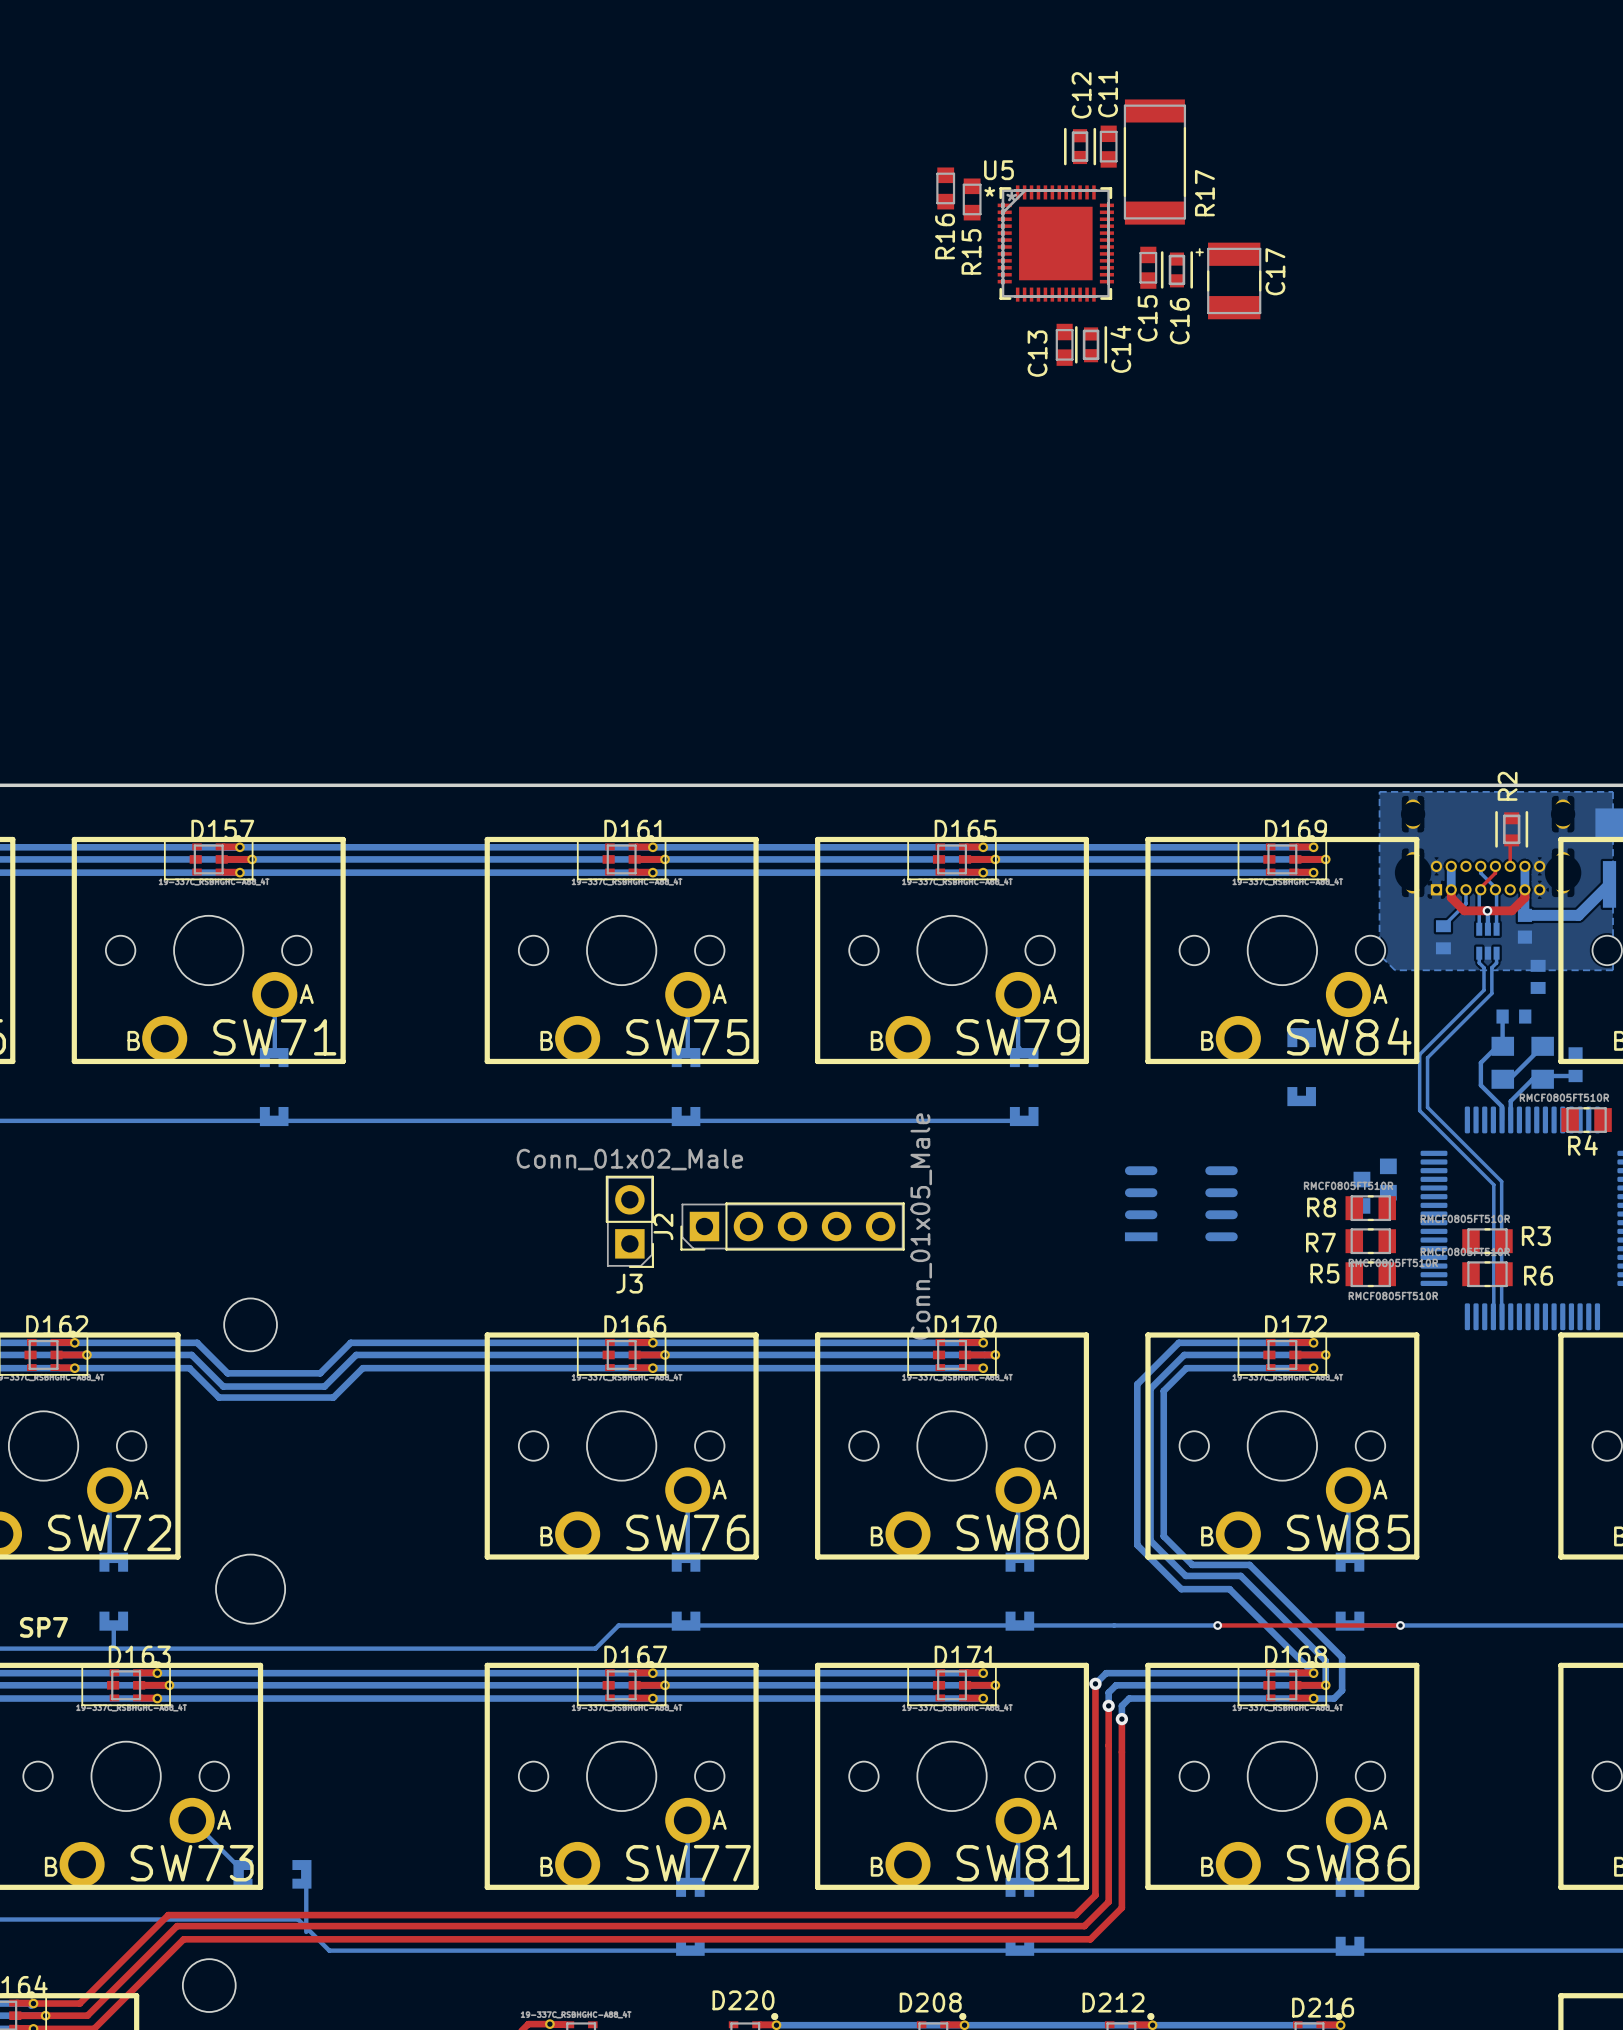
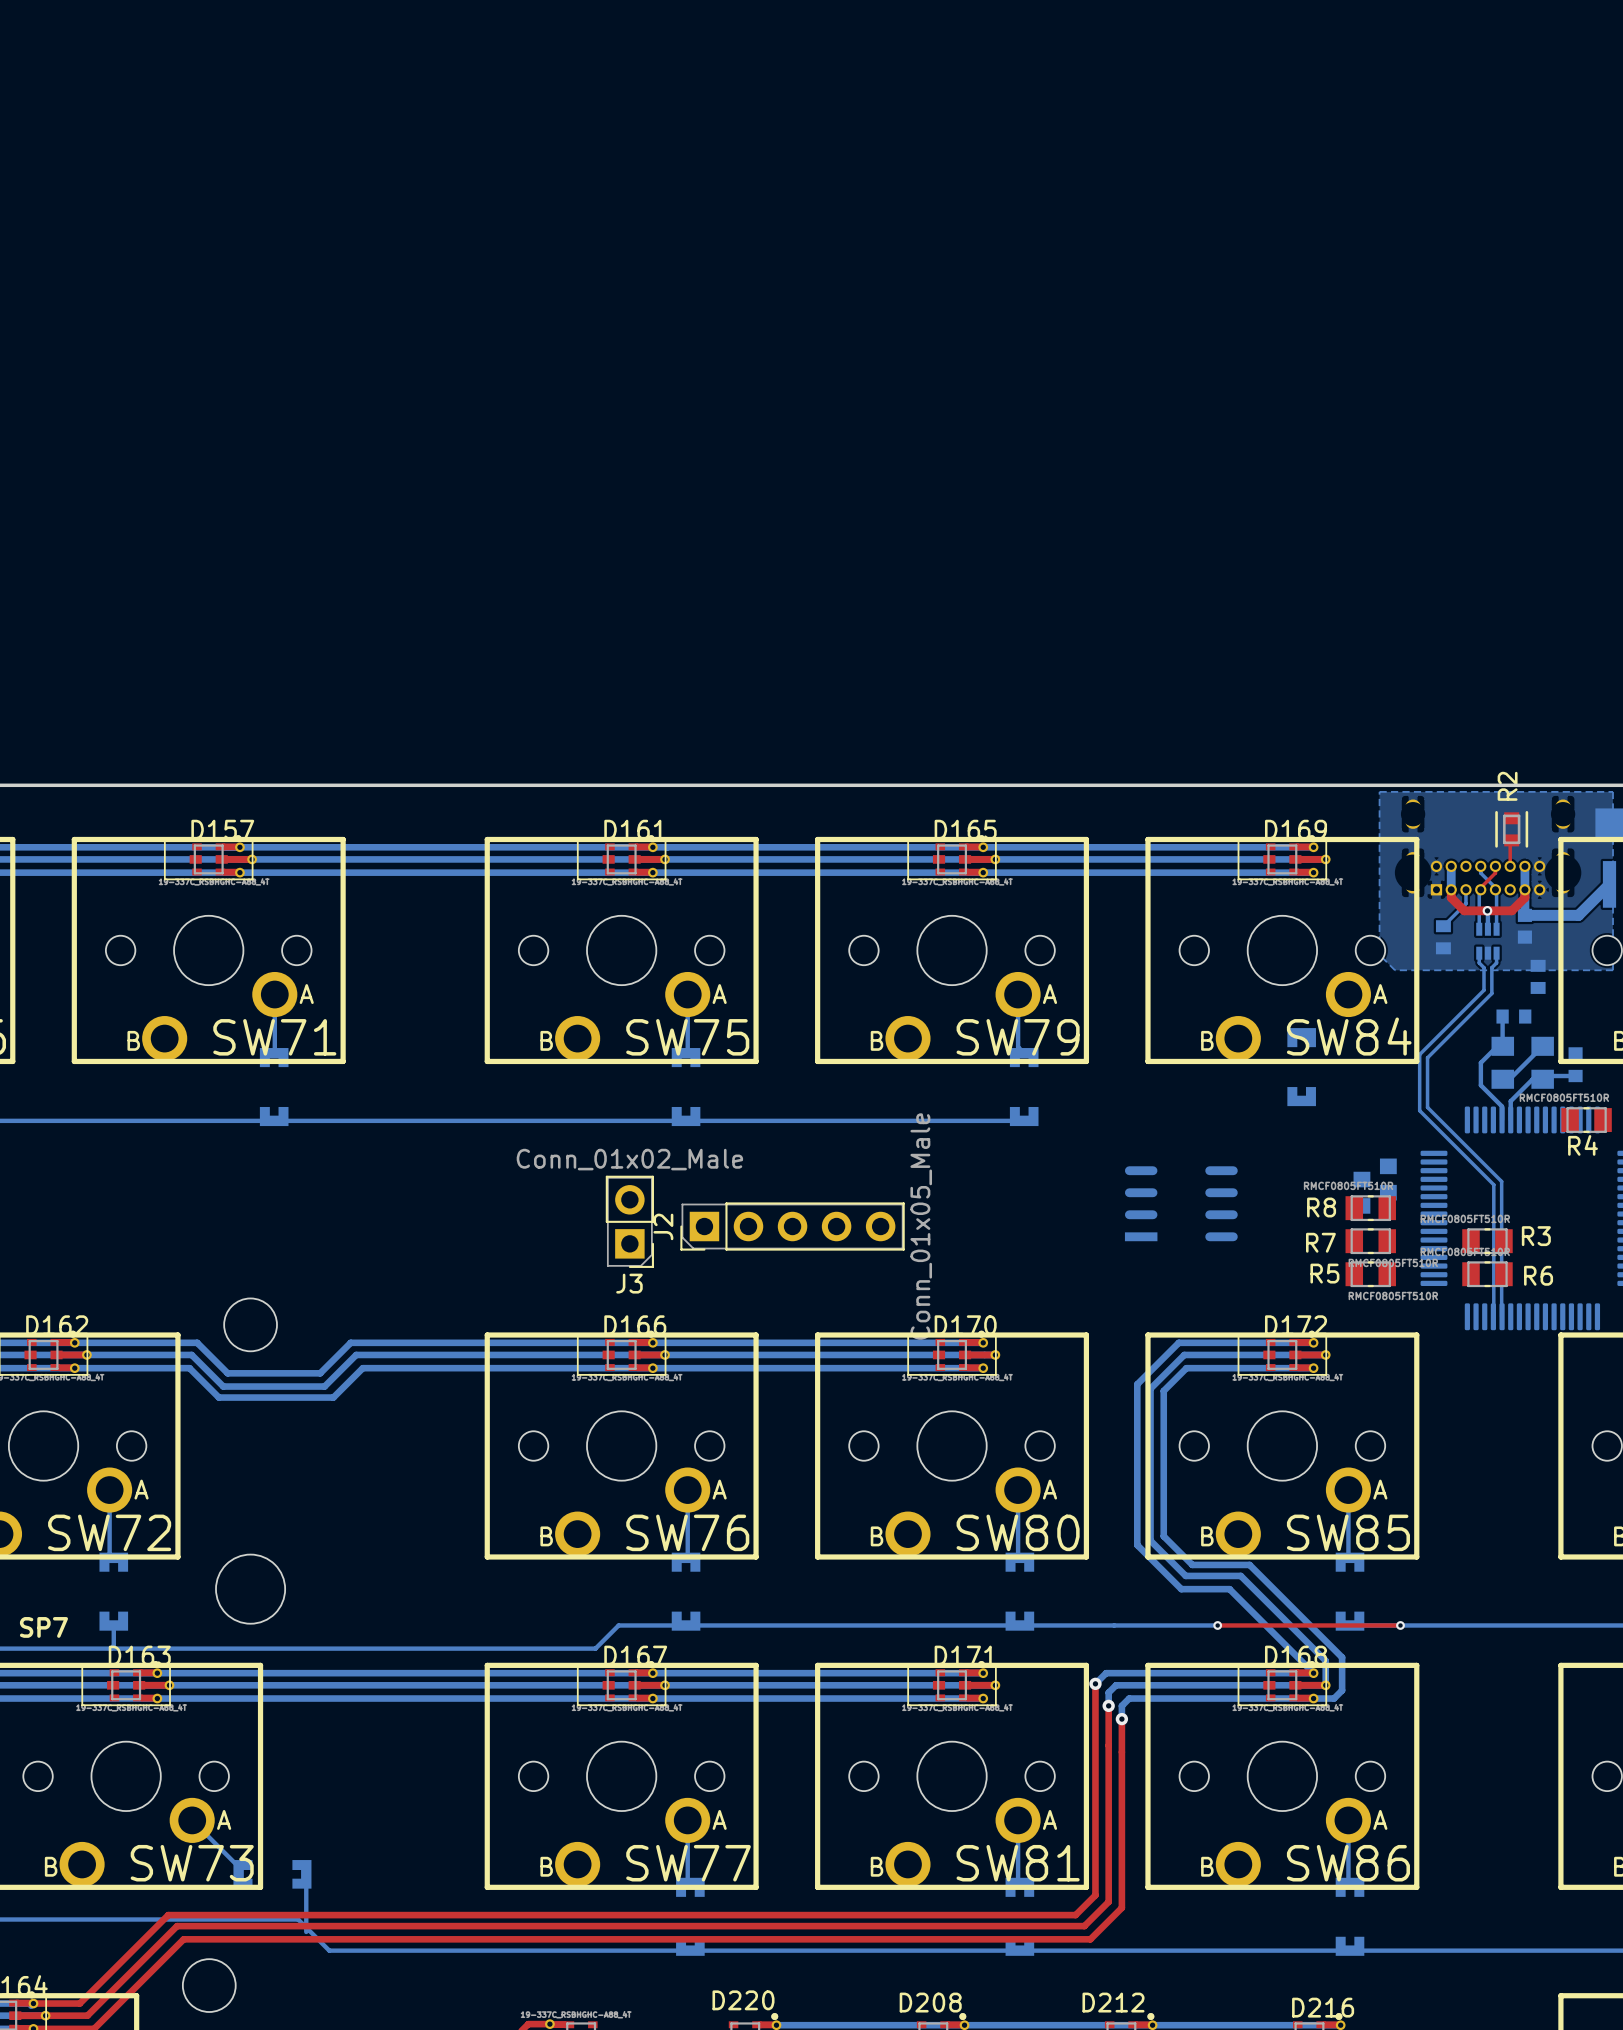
C12: (1080, 146) -> none
C11: (1108, 146) -> none
R17: (1154, 162) -> none
R16: (945, 188) -> none
R15: (972, 199) -> none
U5: (1055, 243) -> none
C15: (1148, 267) -> none
C16: (1176, 269) -> none
C17: (1234, 280) -> none
C13: (1064, 344) -> none
C14: (1091, 344) -> none

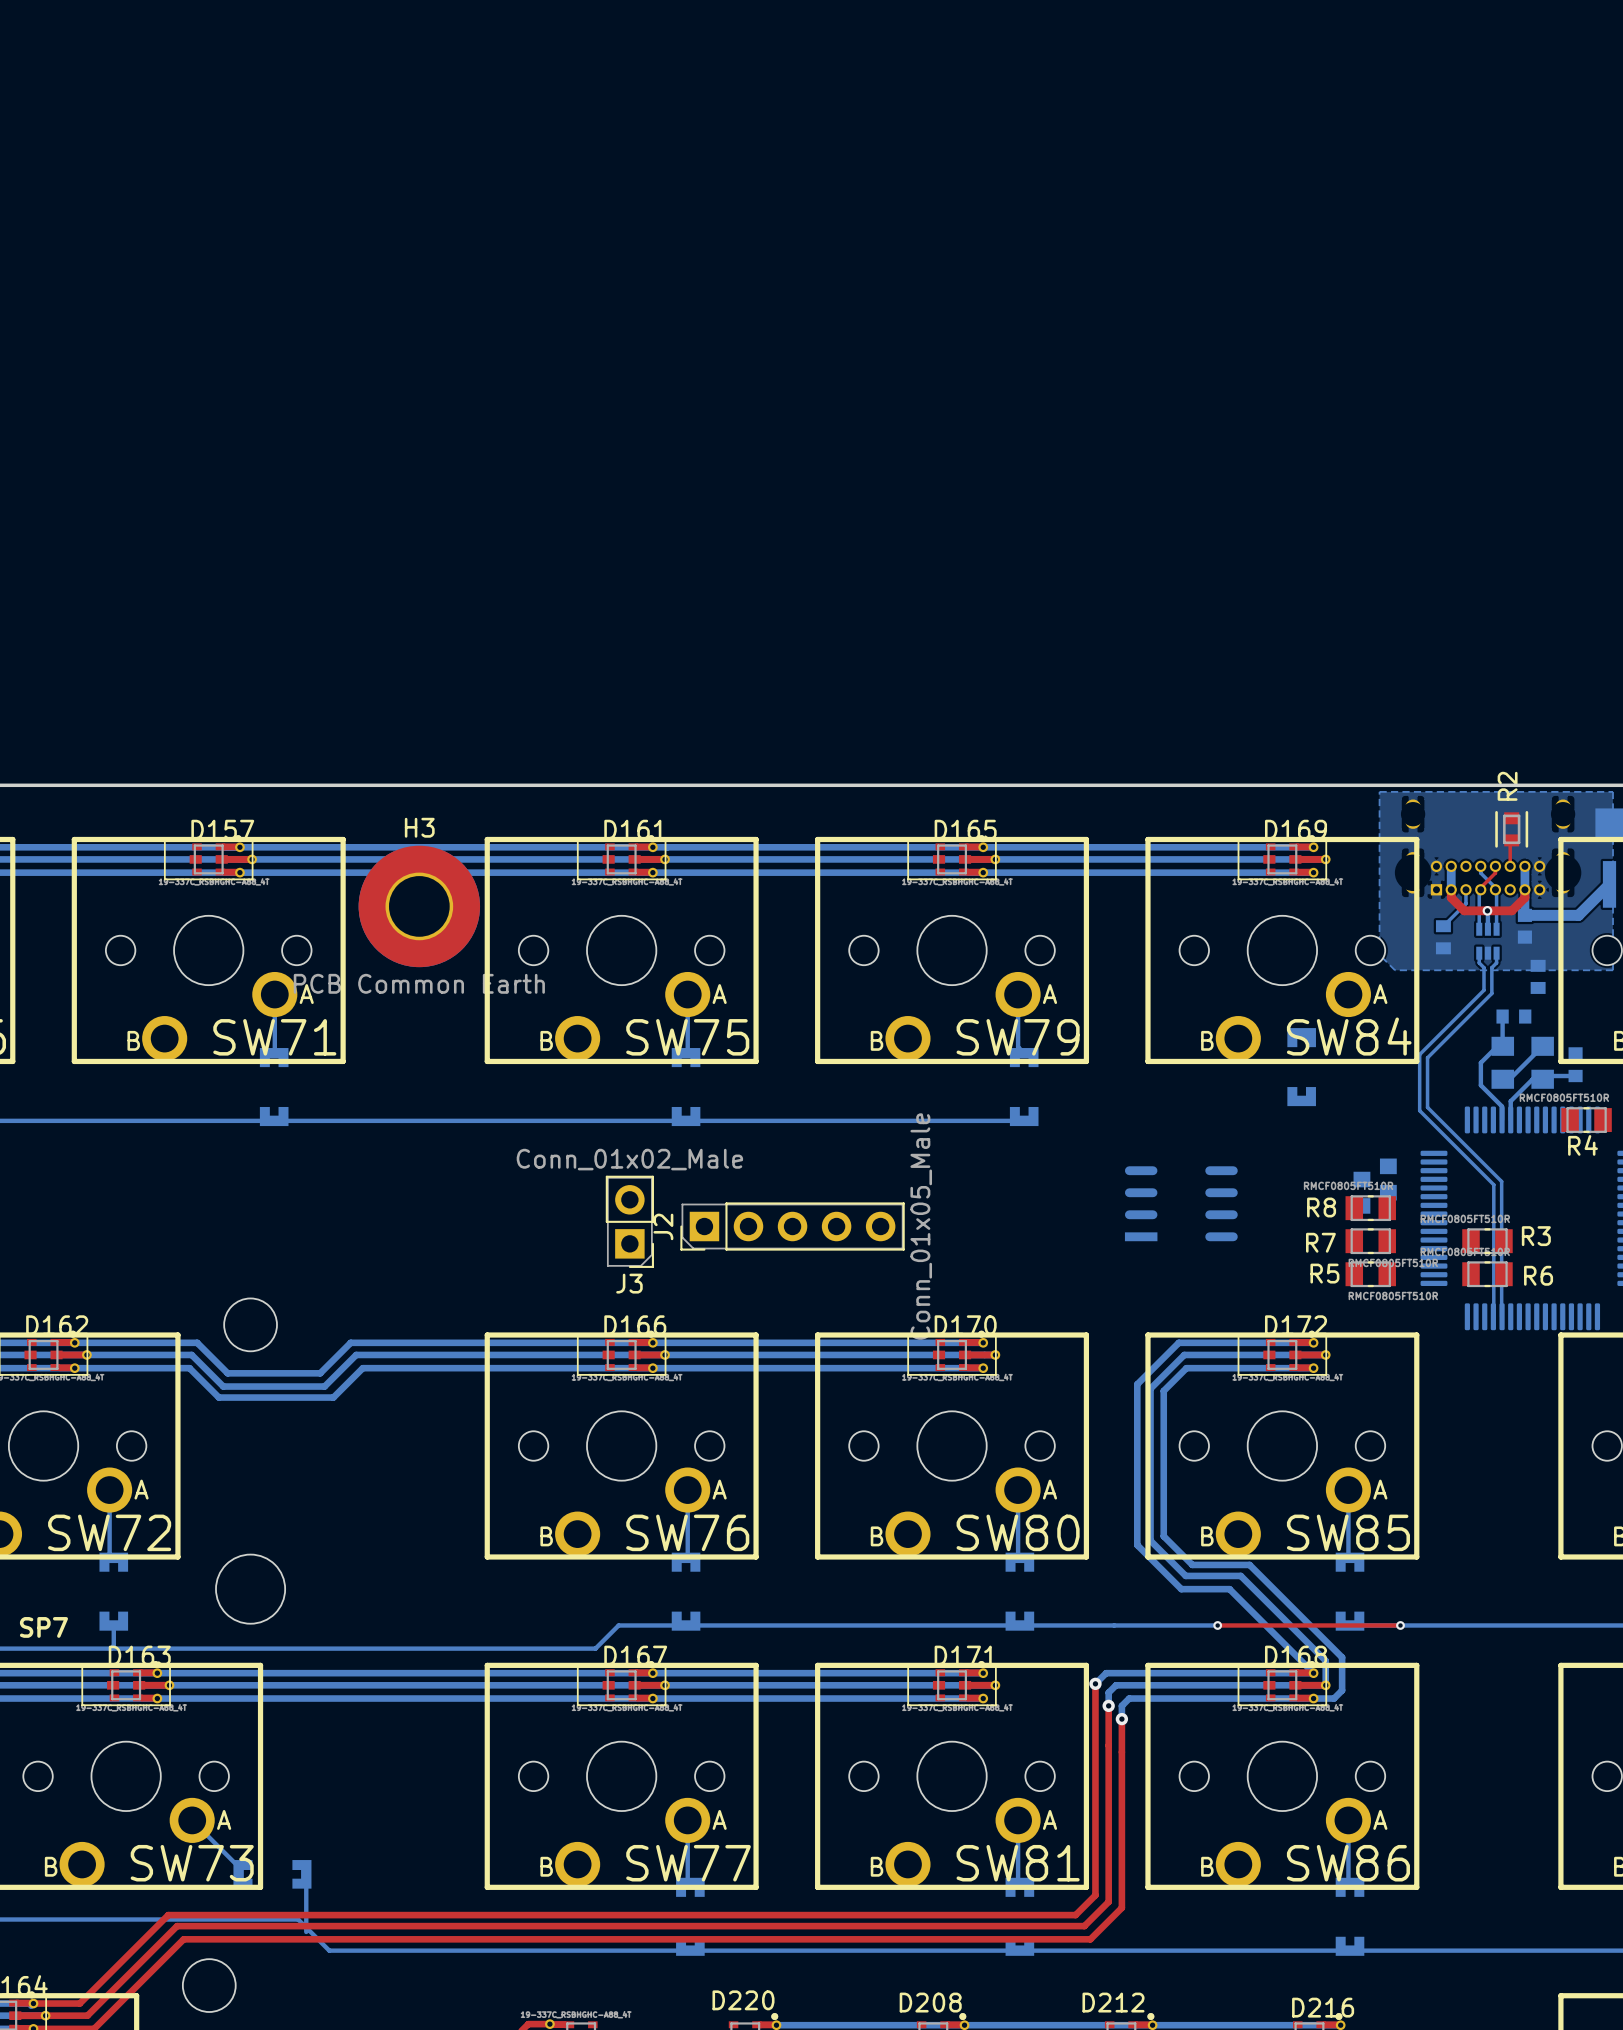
H3: none -> PCB Common Earth (419, 906)

